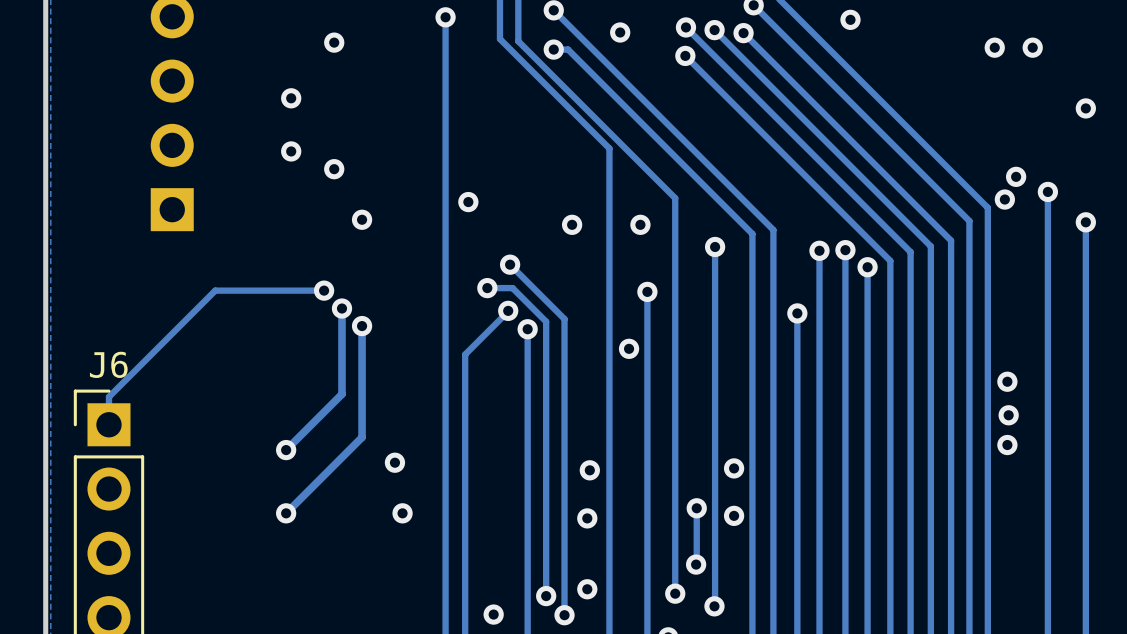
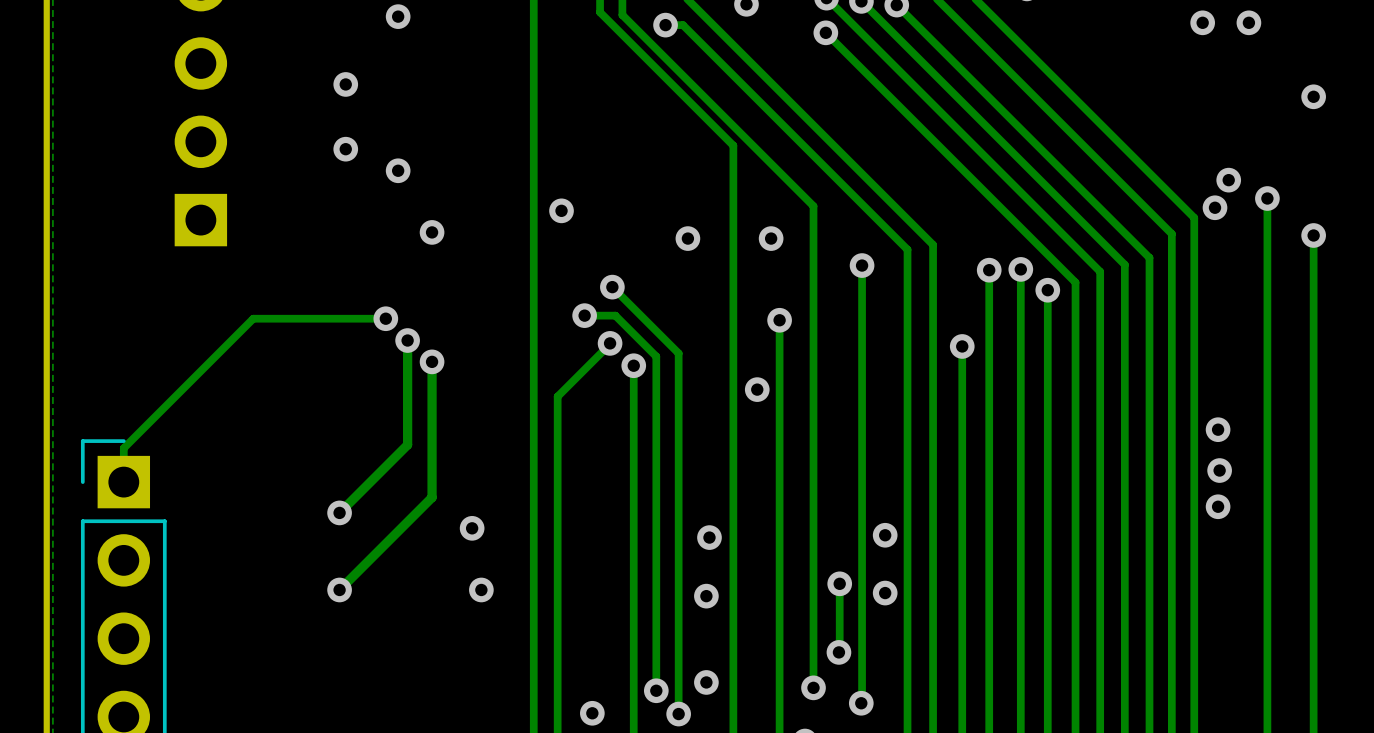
J6 name: J6 (108, 364) -> none

